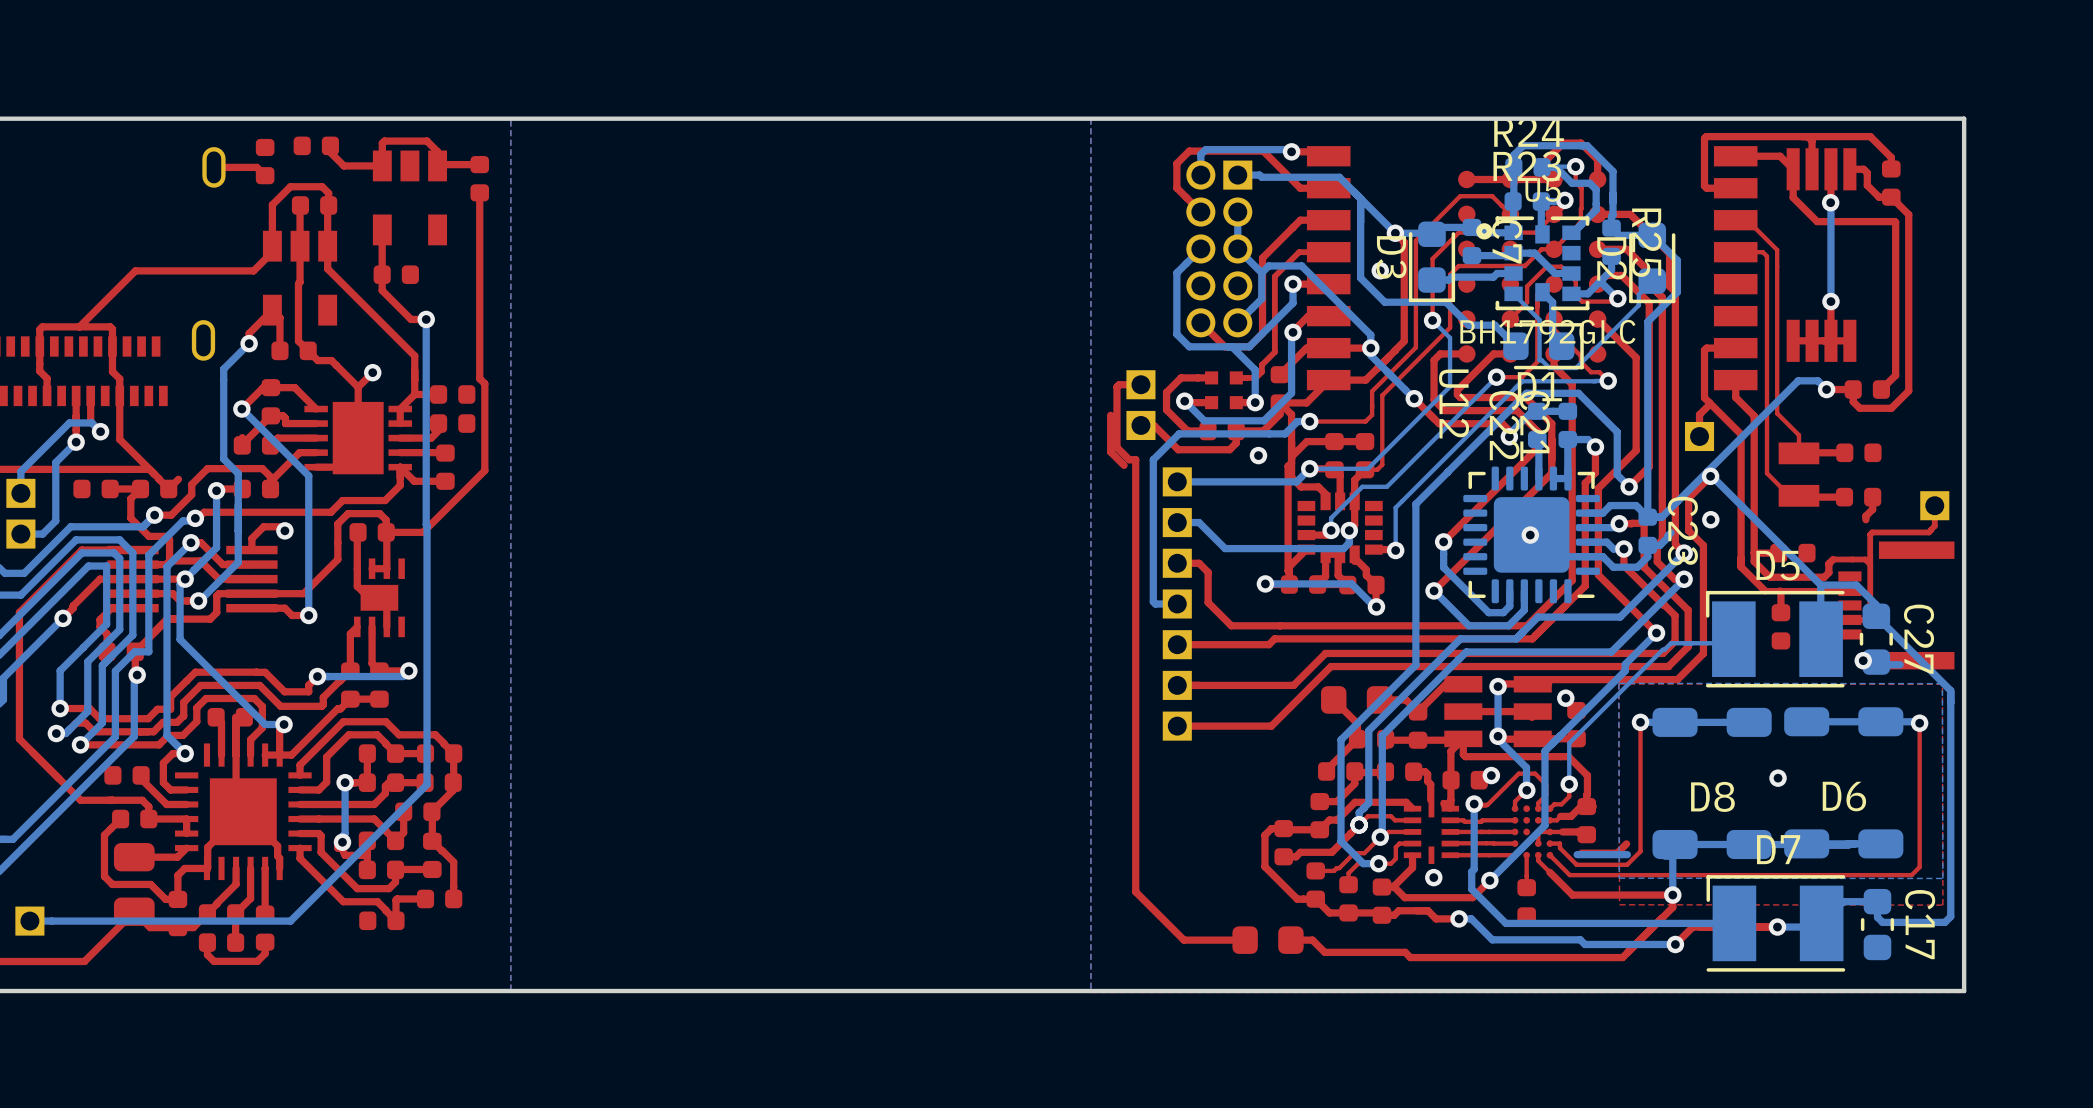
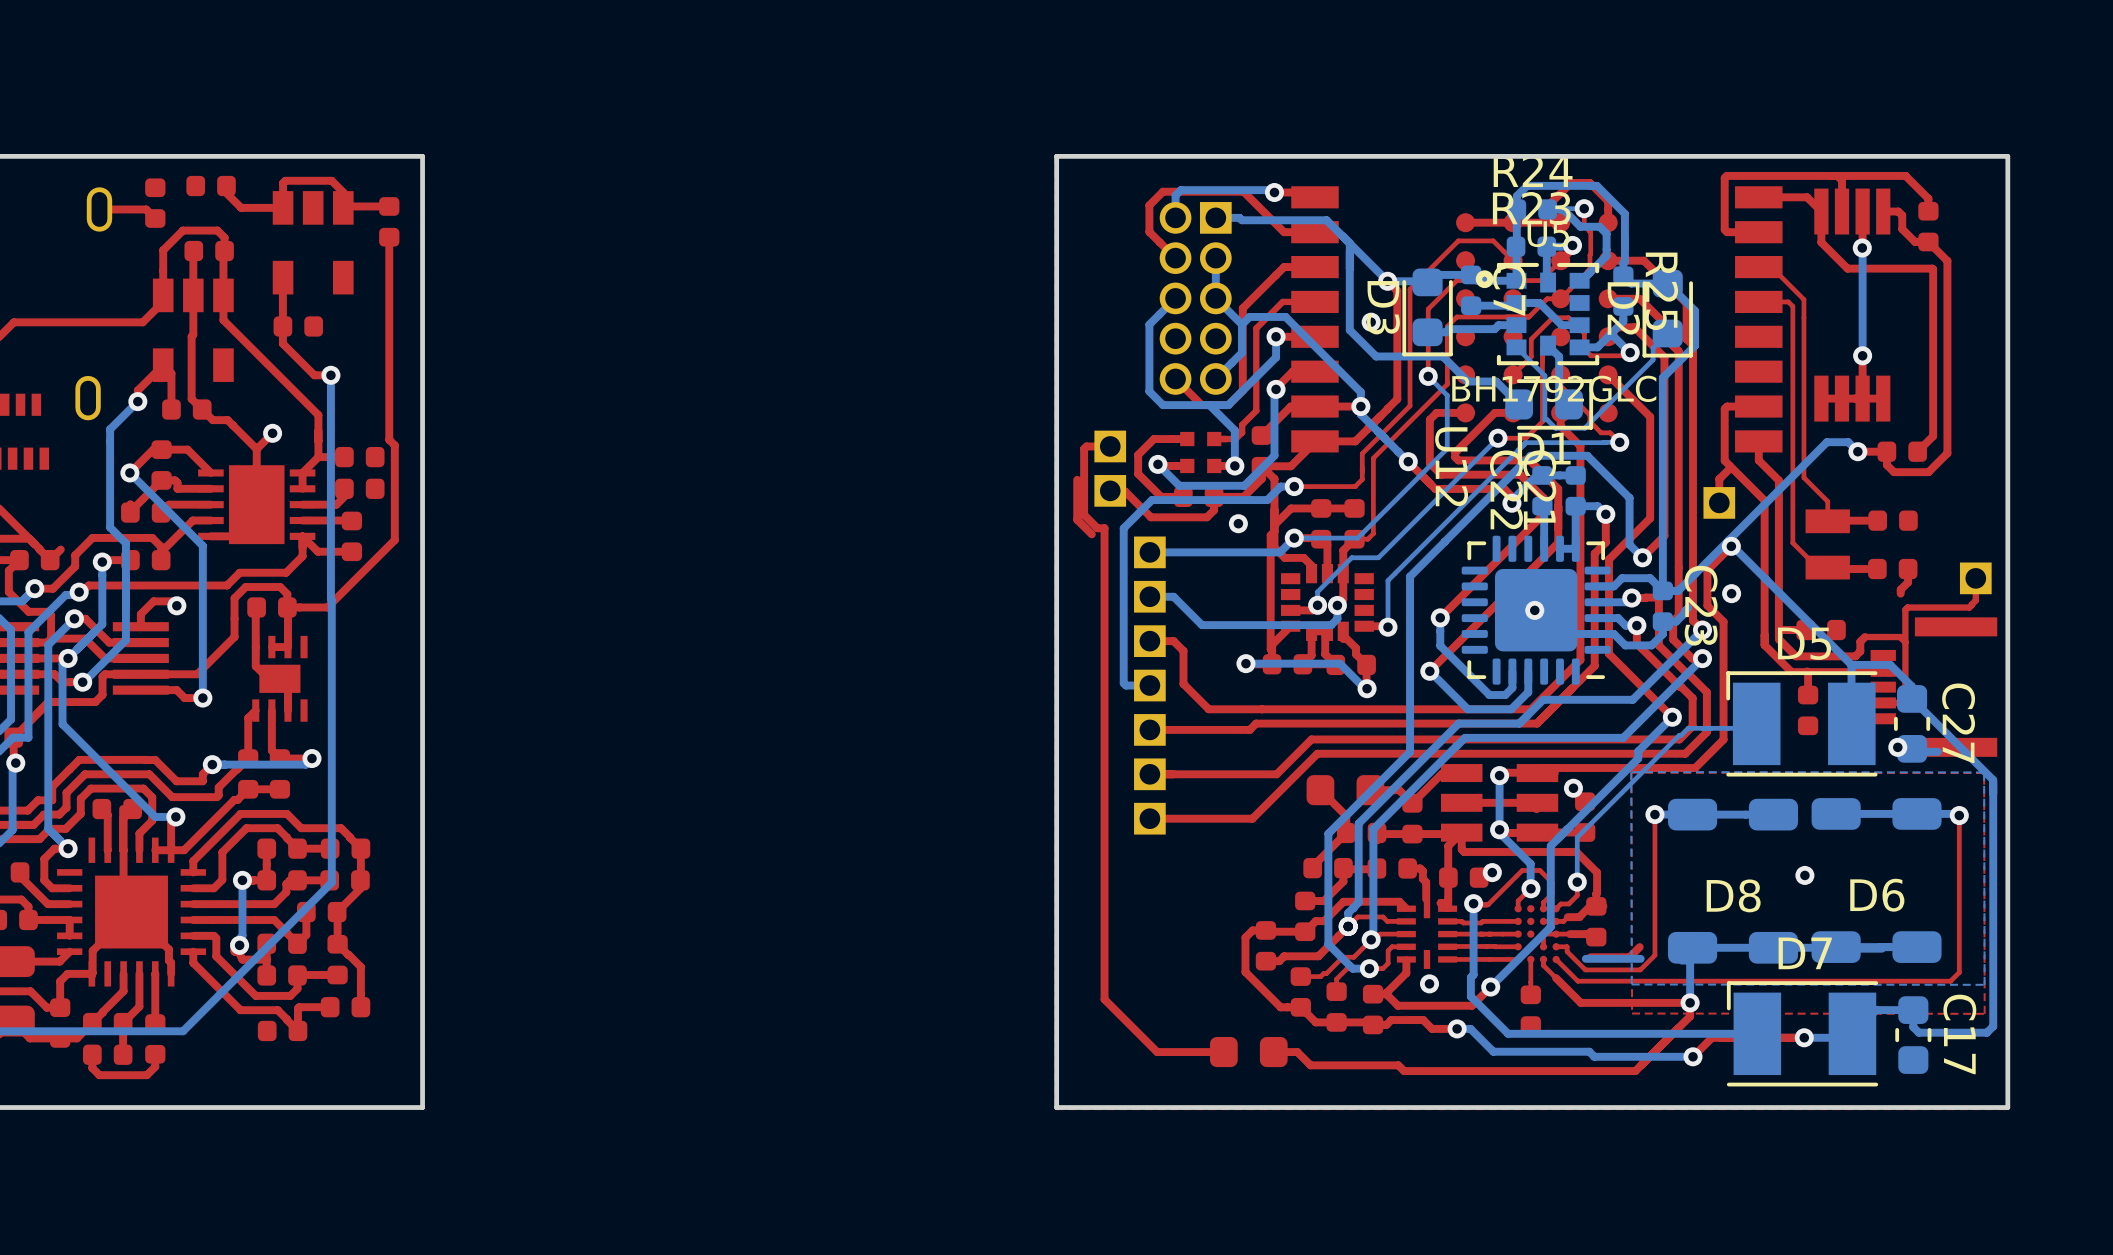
board edge: (1091, 118) (510, 118) -> (1056, 156) (1056, 1107)
board edge: (1091, 991) (510, 991) -> (422, 156) (422, 1107)

